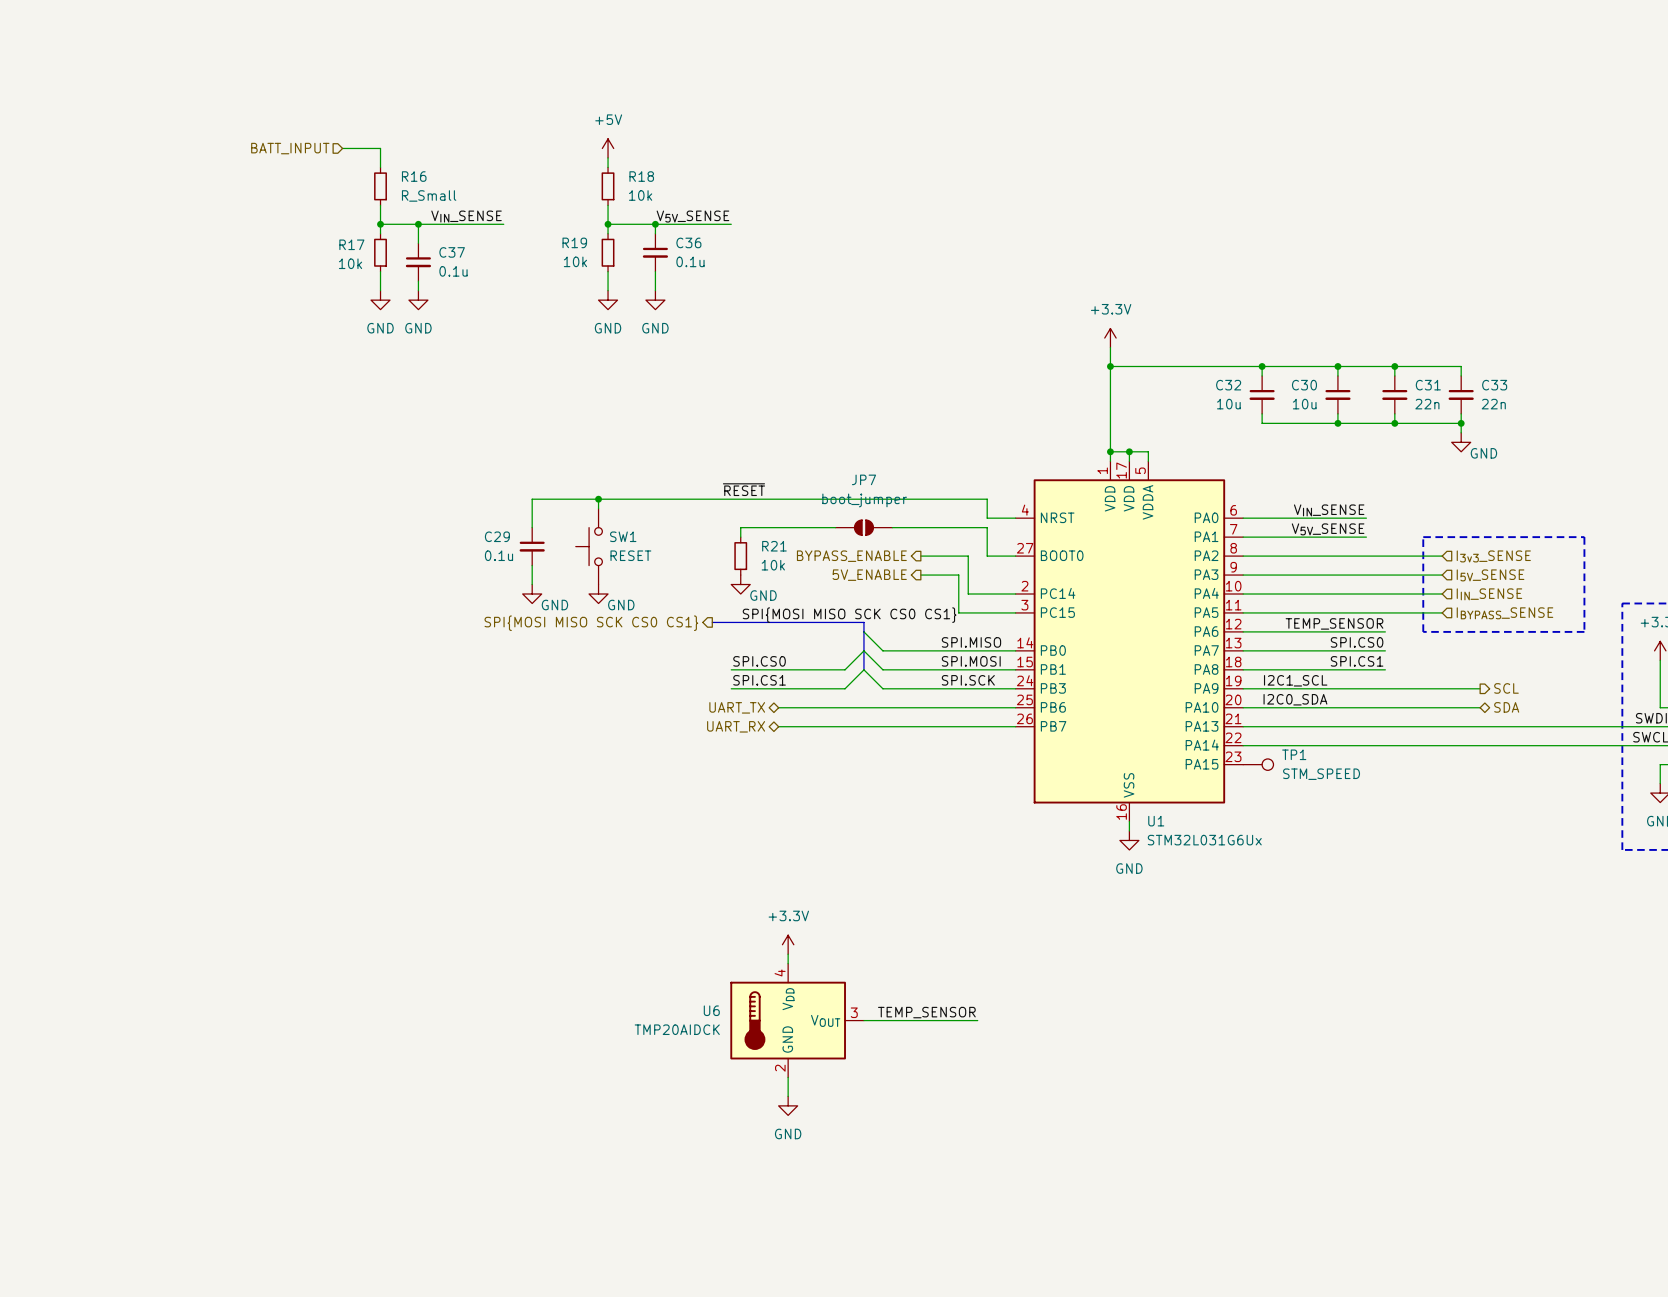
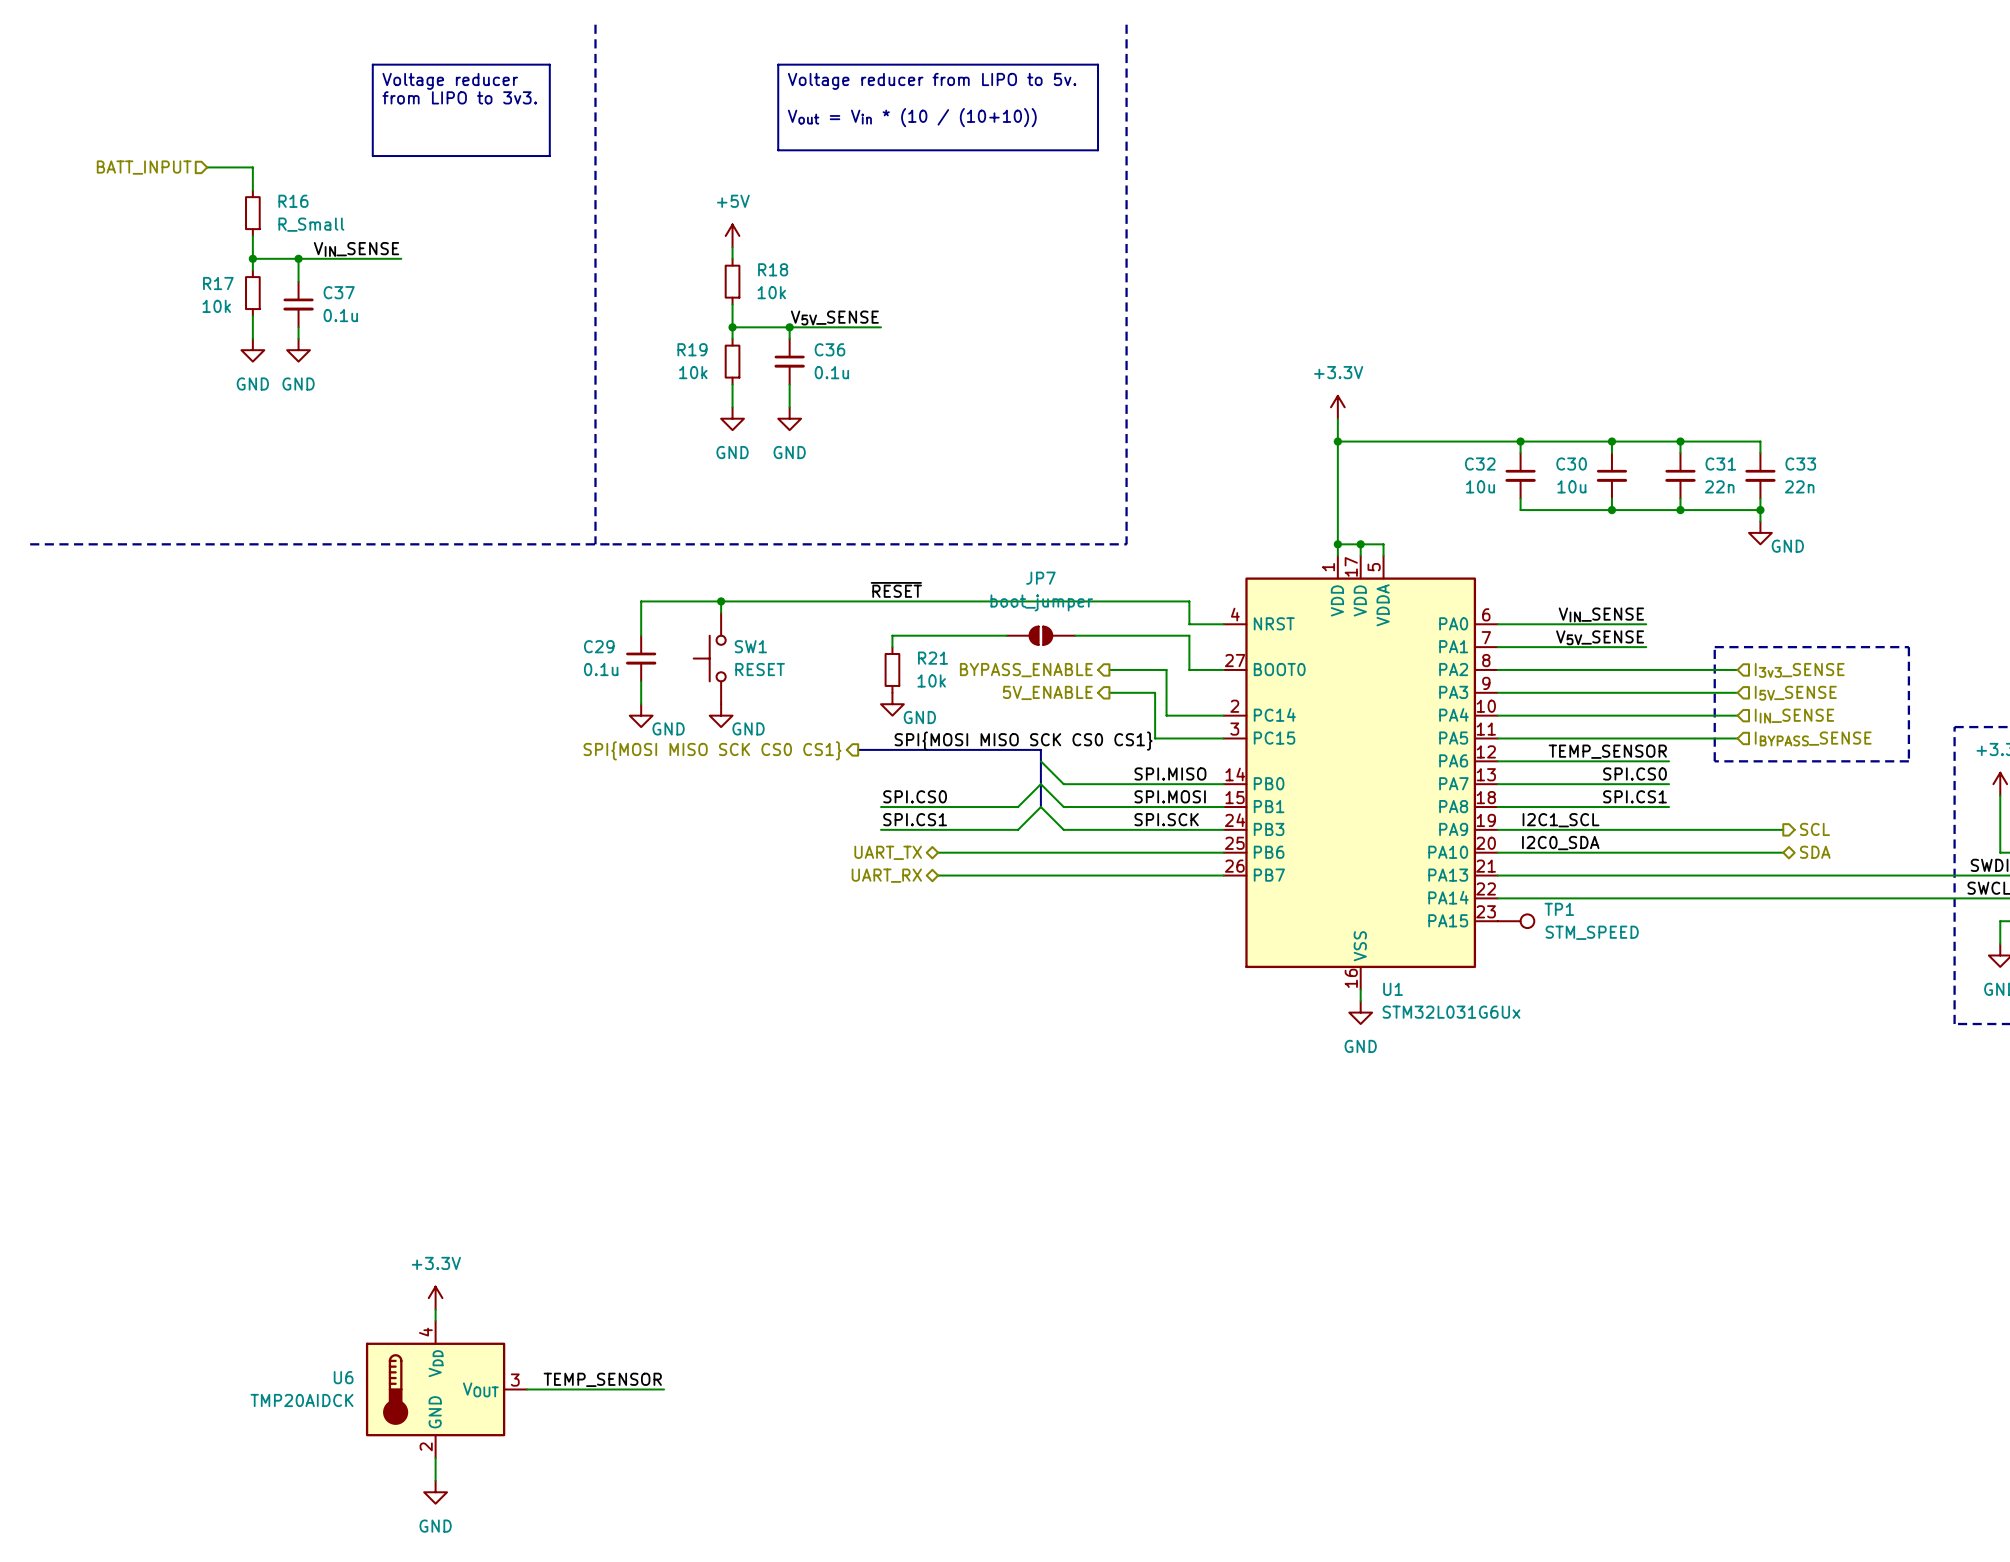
line: none -> (595, 24) (595, 544)
line: none -> (1126, 24) (1126, 544) (30, 544)
line: none -> (372, 64) (549, 64) (549, 156) (372, 156) (372, 64)
line: none -> (778, 64) (1098, 64) (1098, 150) (778, 150) (778, 64)
text: none -> Voltage reducer (450, 81)
text: none -> Voltage reducer from LIPO to 5v. (932, 81)
text: none -> from LIPO to 3v3. (459, 97)
text: none -> Vout = Vin * (10 / (10+10)) (912, 117)
hierarchical label position: BATT_INPUT (290, 148) -> BATT_INPUT (144, 167)
wire: (342, 148) (380, 148) (380, 167) -> (207, 167) (252, 167) (252, 190)
power symbol position: +5V (608, 148) -> +5V (732, 235)
wire: (608, 157) (608, 167) -> none
R16 position: (380, 186) -> (252, 213)
R18 position: (608, 186) -> (732, 281)
wire: (380, 205) (380, 233) -> (252, 235) (252, 270)
junction: none -> (252, 258)
junction: none -> (298, 258)
wire: (608, 214) (608, 233) -> (732, 384) (732, 407)
label position: VIN_SENSE (466, 216) -> VIN_SENSE (356, 249)
label position: V5V_SENSE (692, 216) -> V5V_SENSE (834, 318)
wire: (380, 224) (503, 224) -> (252, 258) (401, 258)
junction: (380, 224) -> none
wire: (418, 224) (418, 243) -> (298, 258) (298, 281)
junction: (418, 224) -> none
wire: (608, 224) (731, 224) -> none
junction: (608, 224) -> none
wire: (655, 224) (655, 233) -> none
junction: (655, 224) -> none
R17 position: (380, 252) -> (252, 293)
wire: none -> (732, 304) (732, 327) (881, 327)
R19 position: (608, 252) -> (732, 361)
C36 position: (655, 252) -> (789, 361)
C37 position: (418, 262) -> (298, 304)
wire: (380, 271) (380, 290) -> (252, 315) (252, 338)
junction: none -> (732, 327)
junction: none -> (789, 327)
wire: (418, 281) (418, 290) -> (298, 327) (298, 338)
power symbol: none -> GND (252, 350)
power symbol: none -> GND (298, 350)
power symbol: GND (380, 300) -> none
power symbol: GND (418, 300) -> none
power symbol: GND (608, 300) -> none
power symbol: GND (655, 300) -> none
wire: none -> (789, 384) (789, 407)
power symbol: none -> GND (732, 418)
power symbol: none -> GND (789, 418)
power symbol: +3.3V (788, 944) -> none
wire: (788, 954) (788, 963) -> none
label: TEMP_SENSOR (926, 1012) -> none
U6 position: (797, 1020) -> (446, 1389)
wire: (863, 1020) (977, 1020) -> none
power symbol: none -> +3.3V (435, 1298)
wire: (788, 1077) (788, 1096) -> none
wire: none -> (435, 1309) (435, 1320)
power symbol: GND (788, 1105) -> none
label: none -> TEMP_SENSOR (602, 1379)
wire: none -> (526, 1389) (664, 1389)
wire: none -> (435, 1458) (435, 1480)
power symbol: none -> GND (435, 1492)

